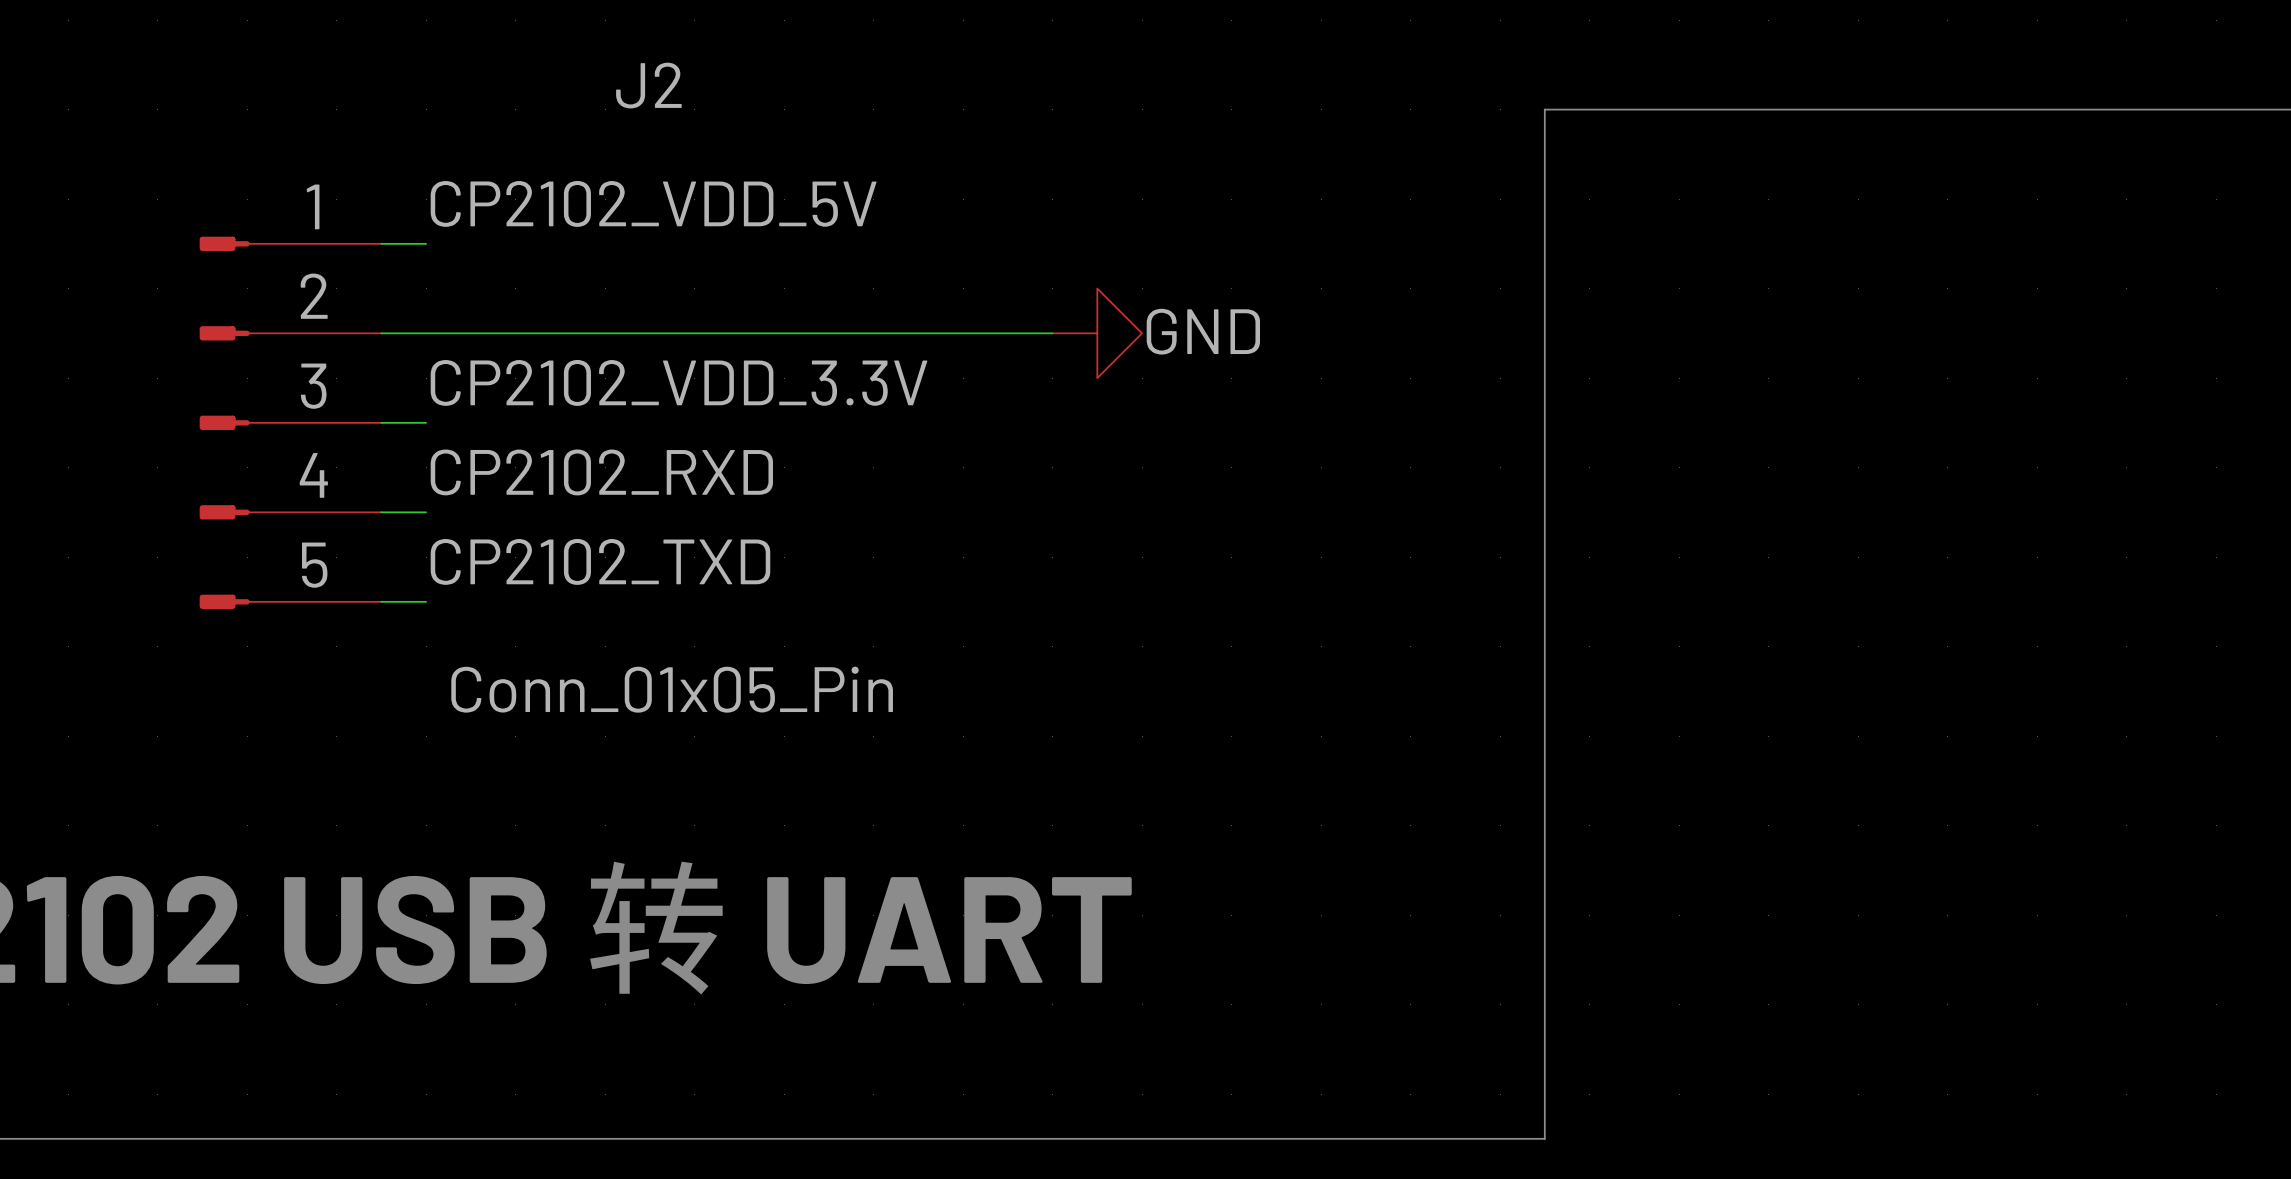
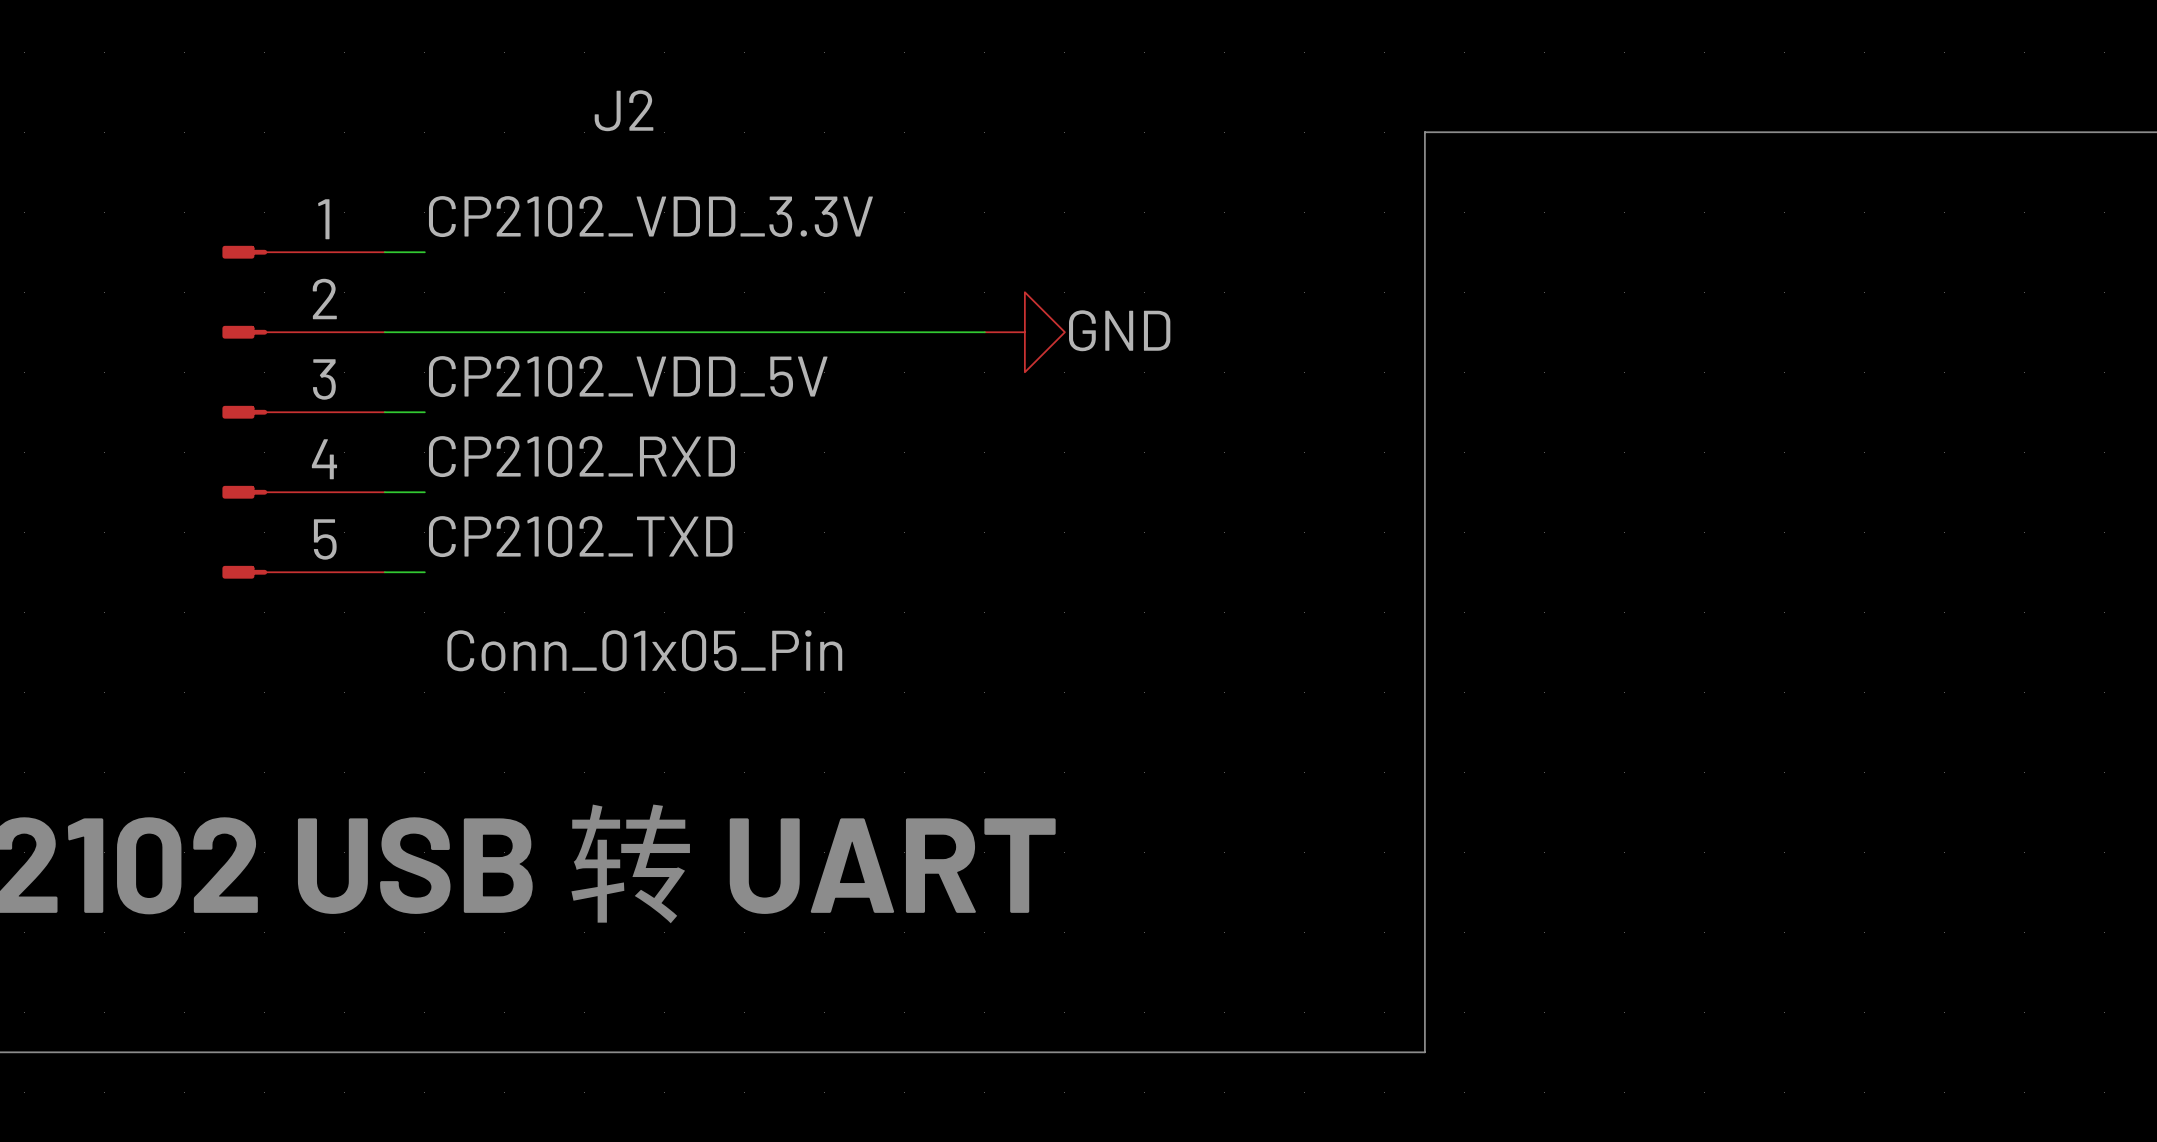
label: CP2102_VDD_5V (653, 203) -> CP2102_VDD_3.3V (650, 216)
label: CP2102_VDD_3.3V (679, 382) -> CP2102_VDD_5V (628, 376)

